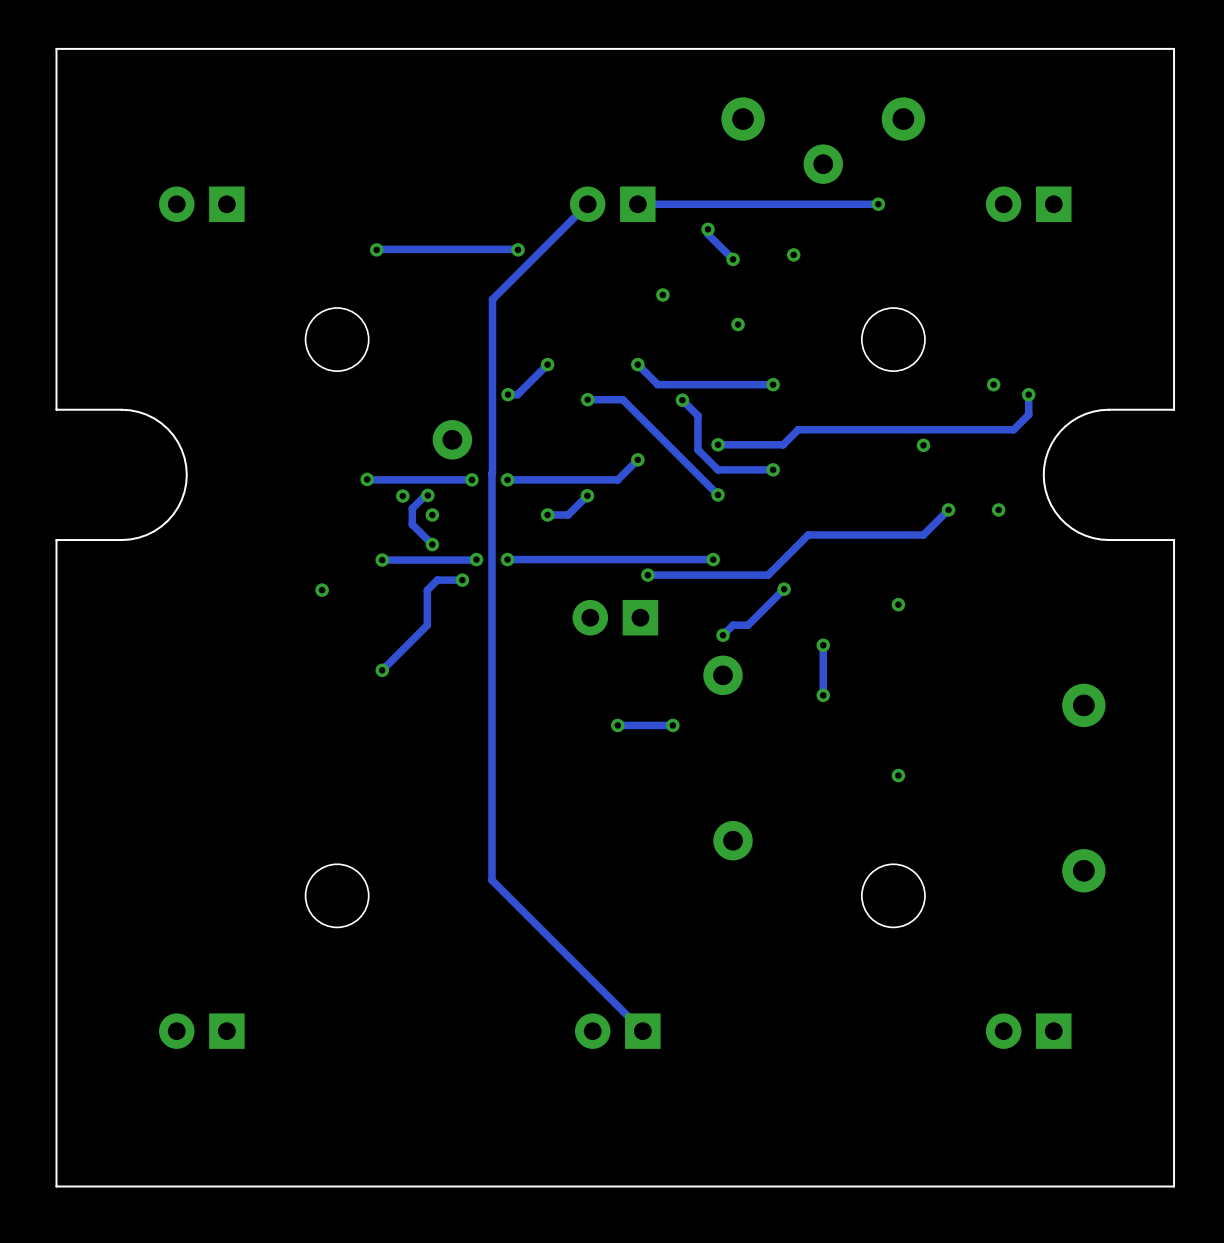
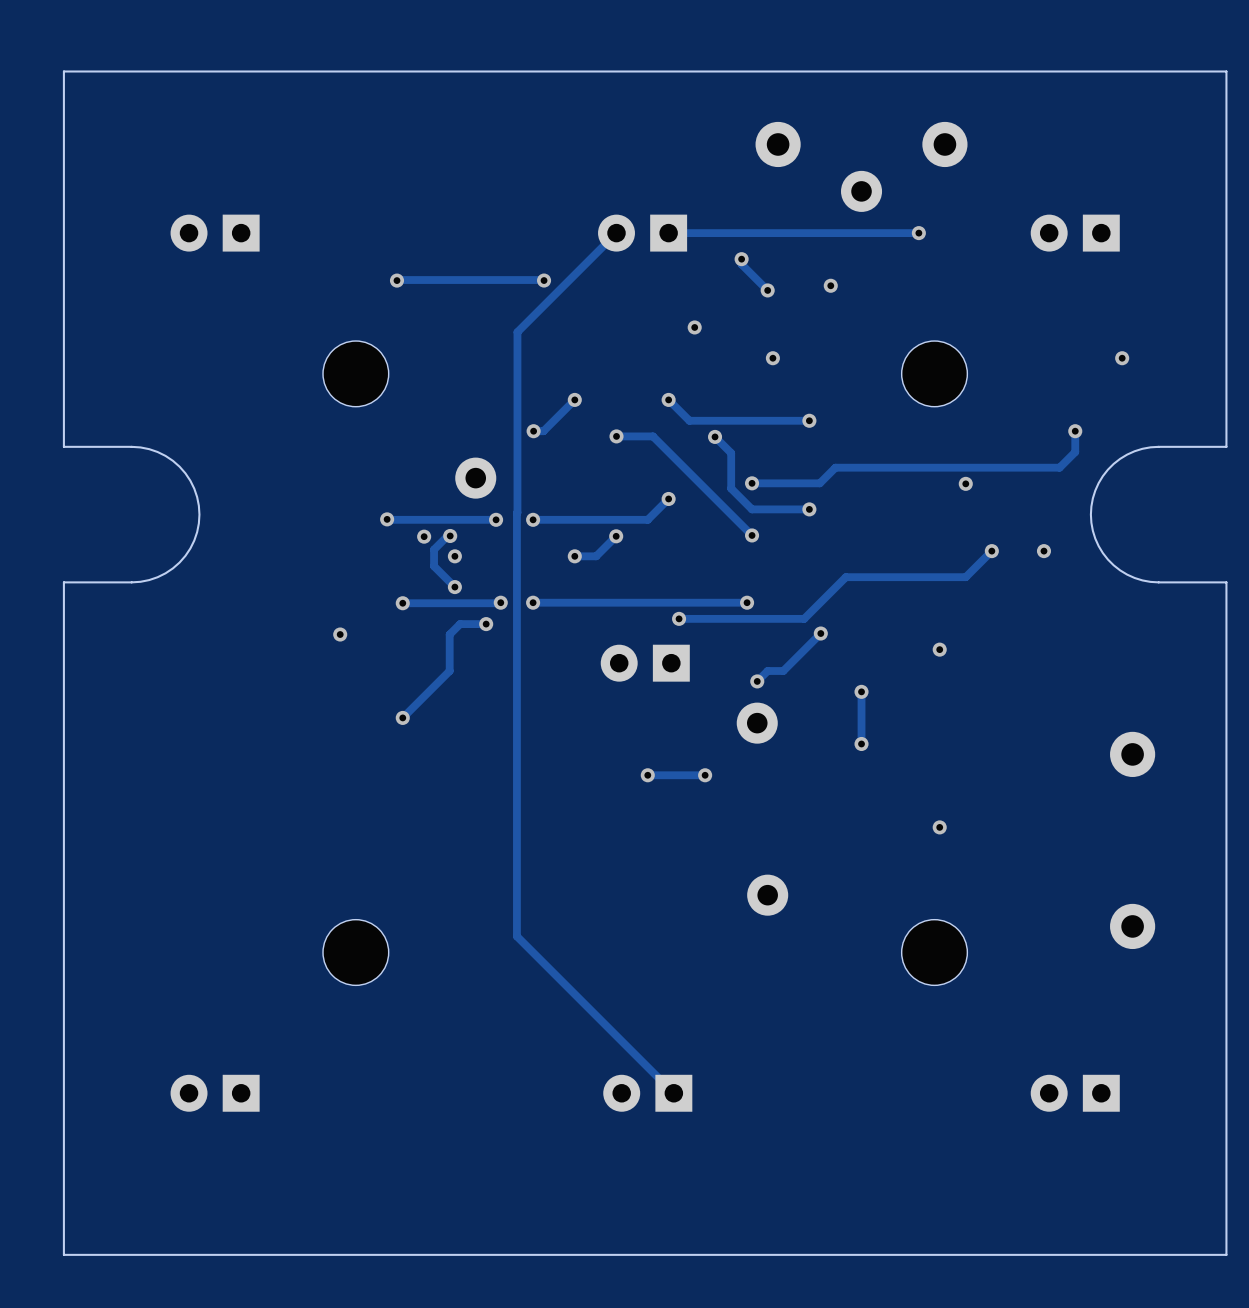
via position: (993, 384) -> (1122, 358)

